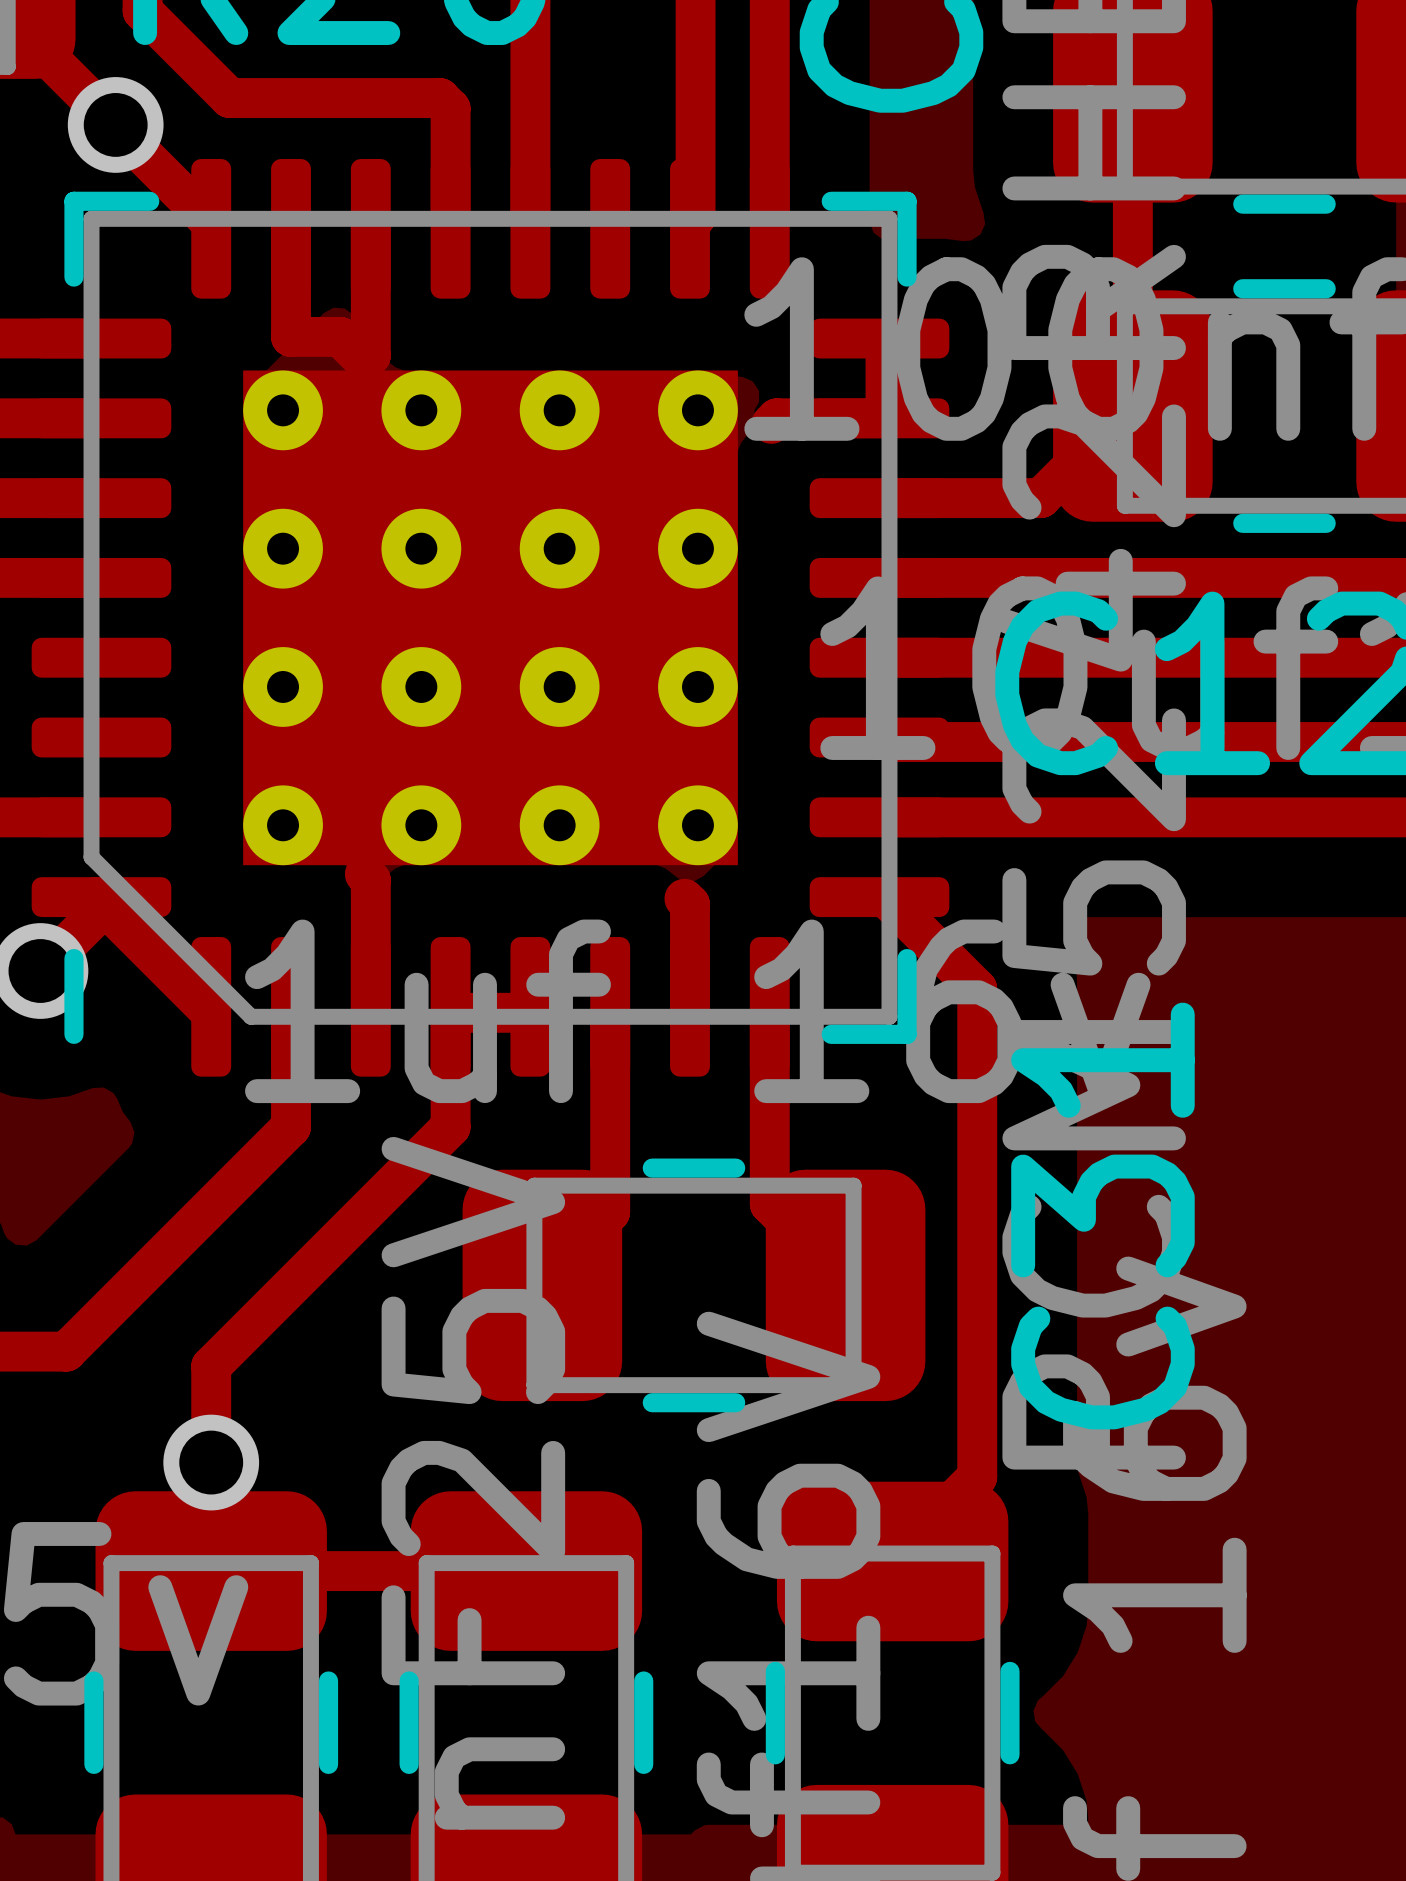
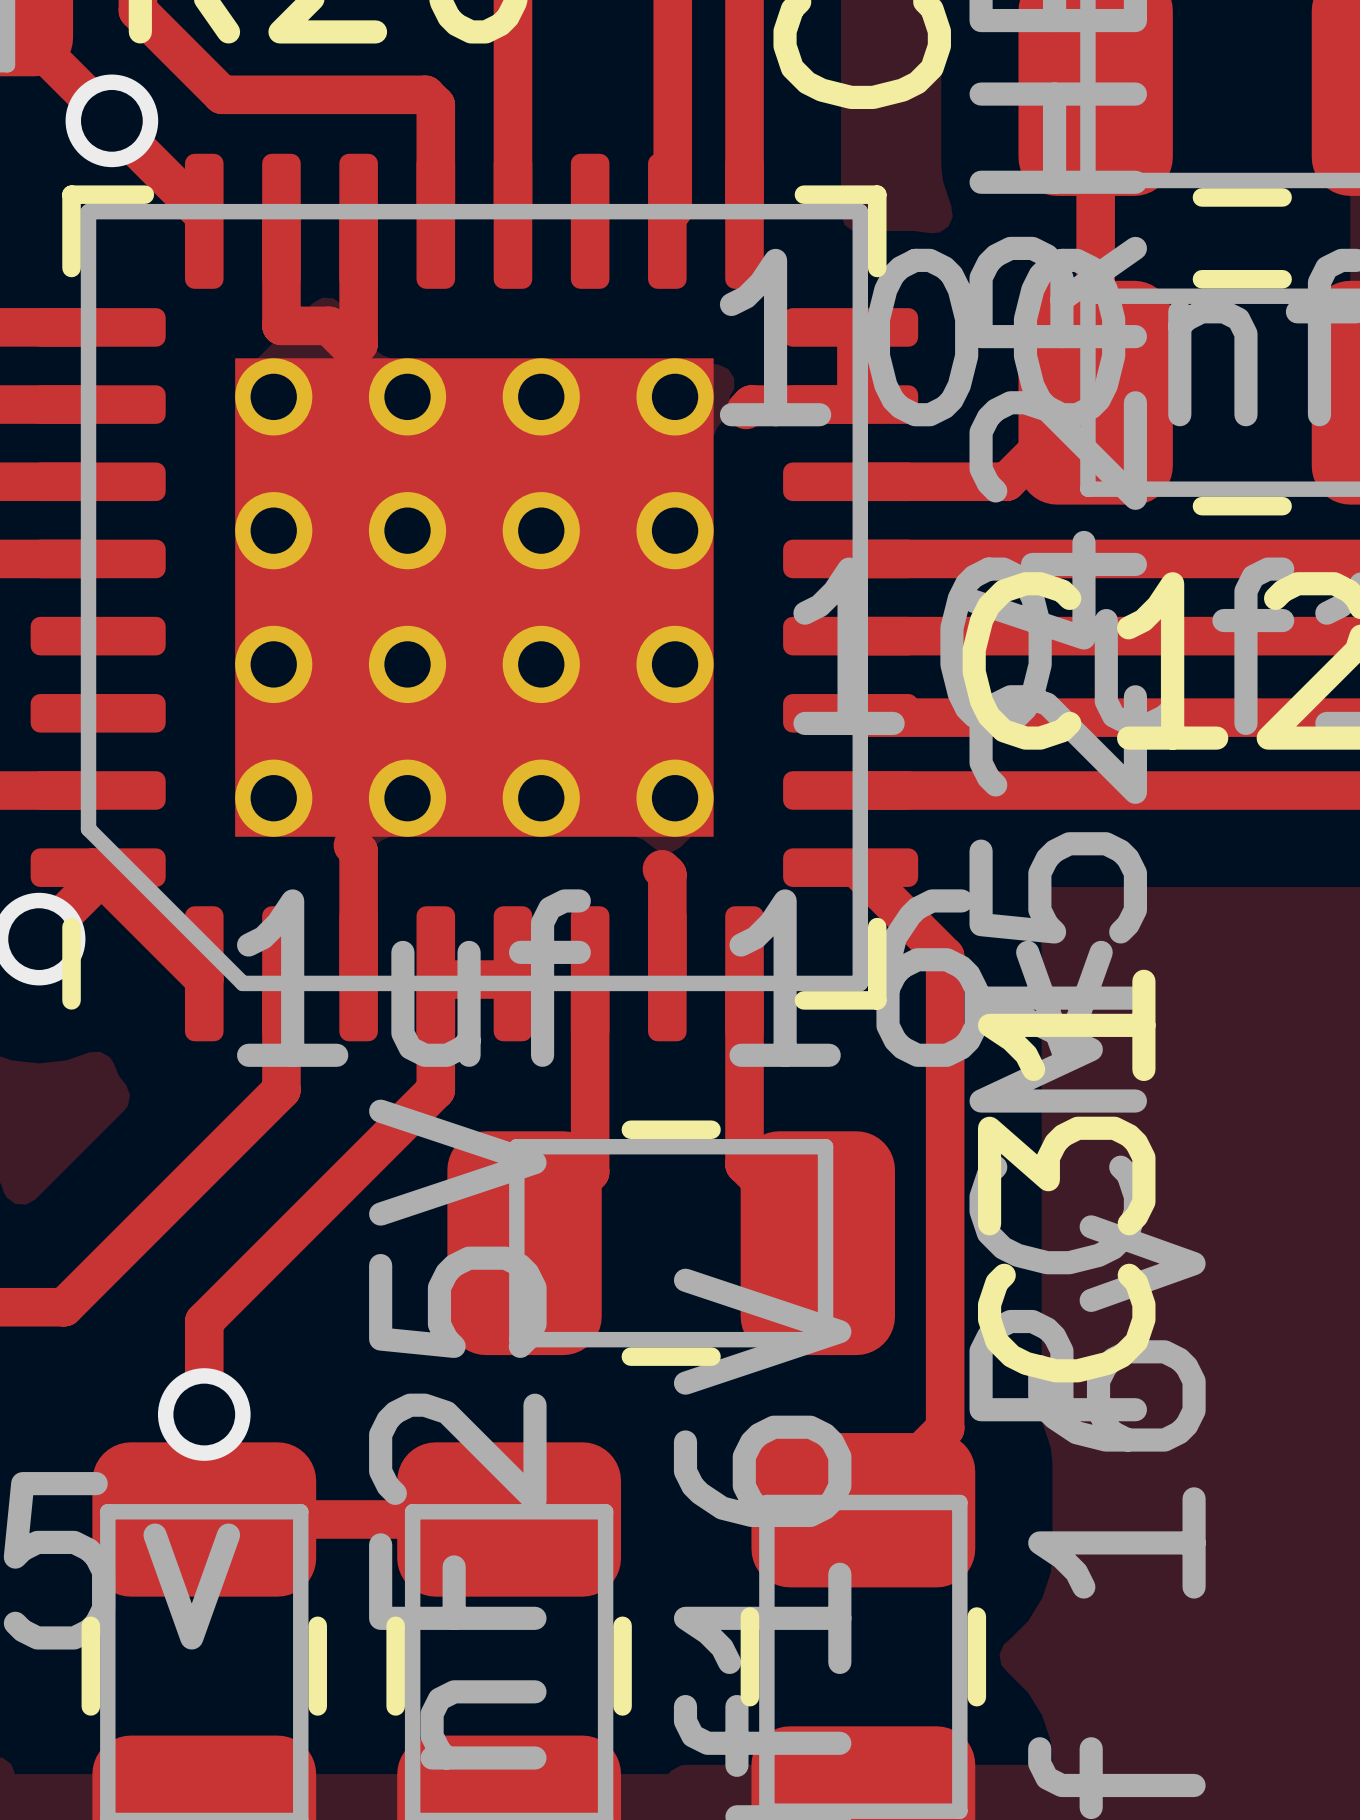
part footprint: [31, 159, 950, 1077] -> [30, 153, 919, 1042]

